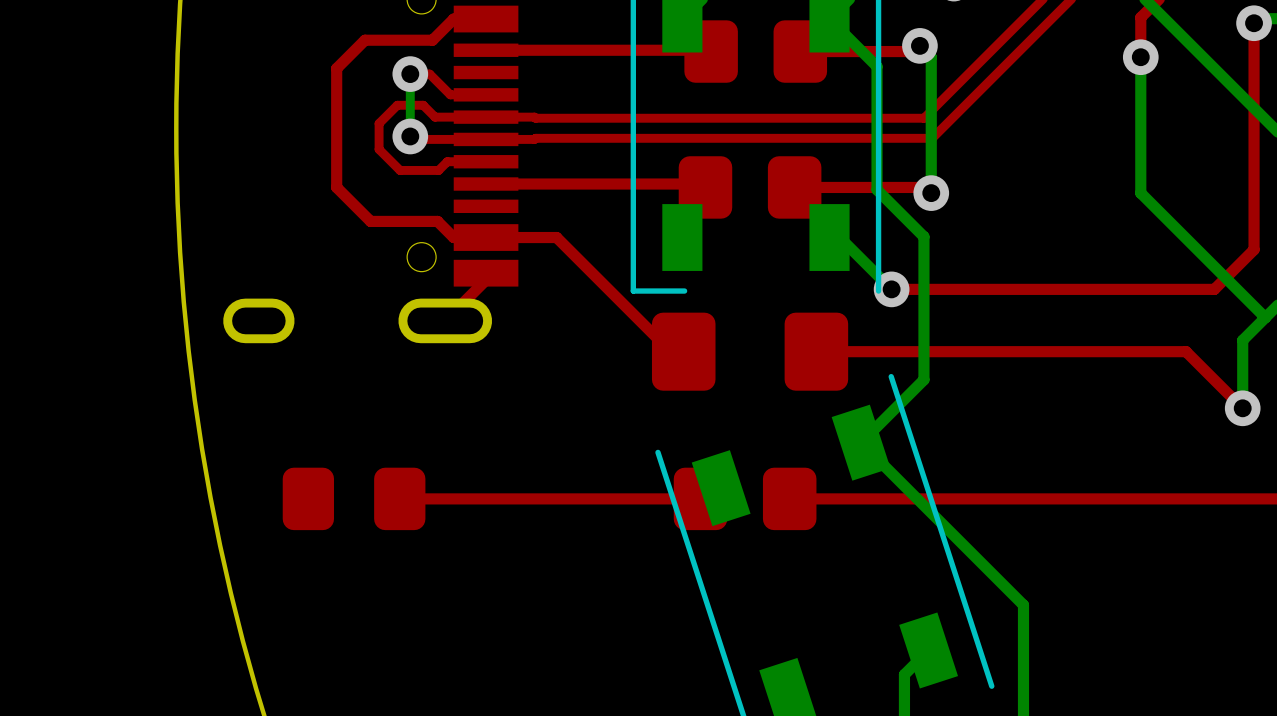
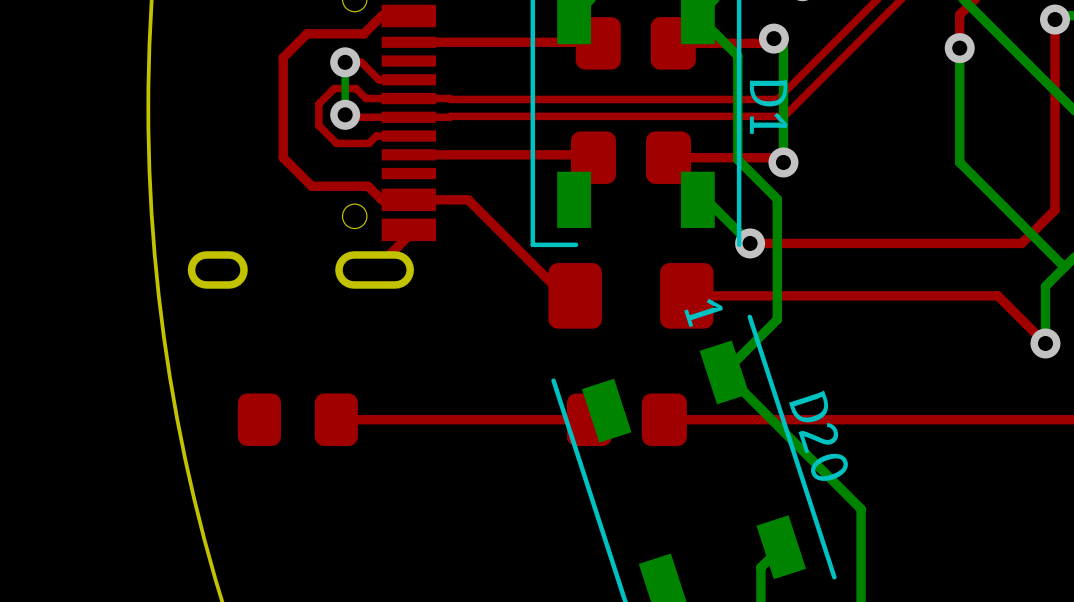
D1 name: none -> D1 (768, 106)
D20 text: none -> 1 (703, 312)
D20 name: none -> D20 (818, 435)

